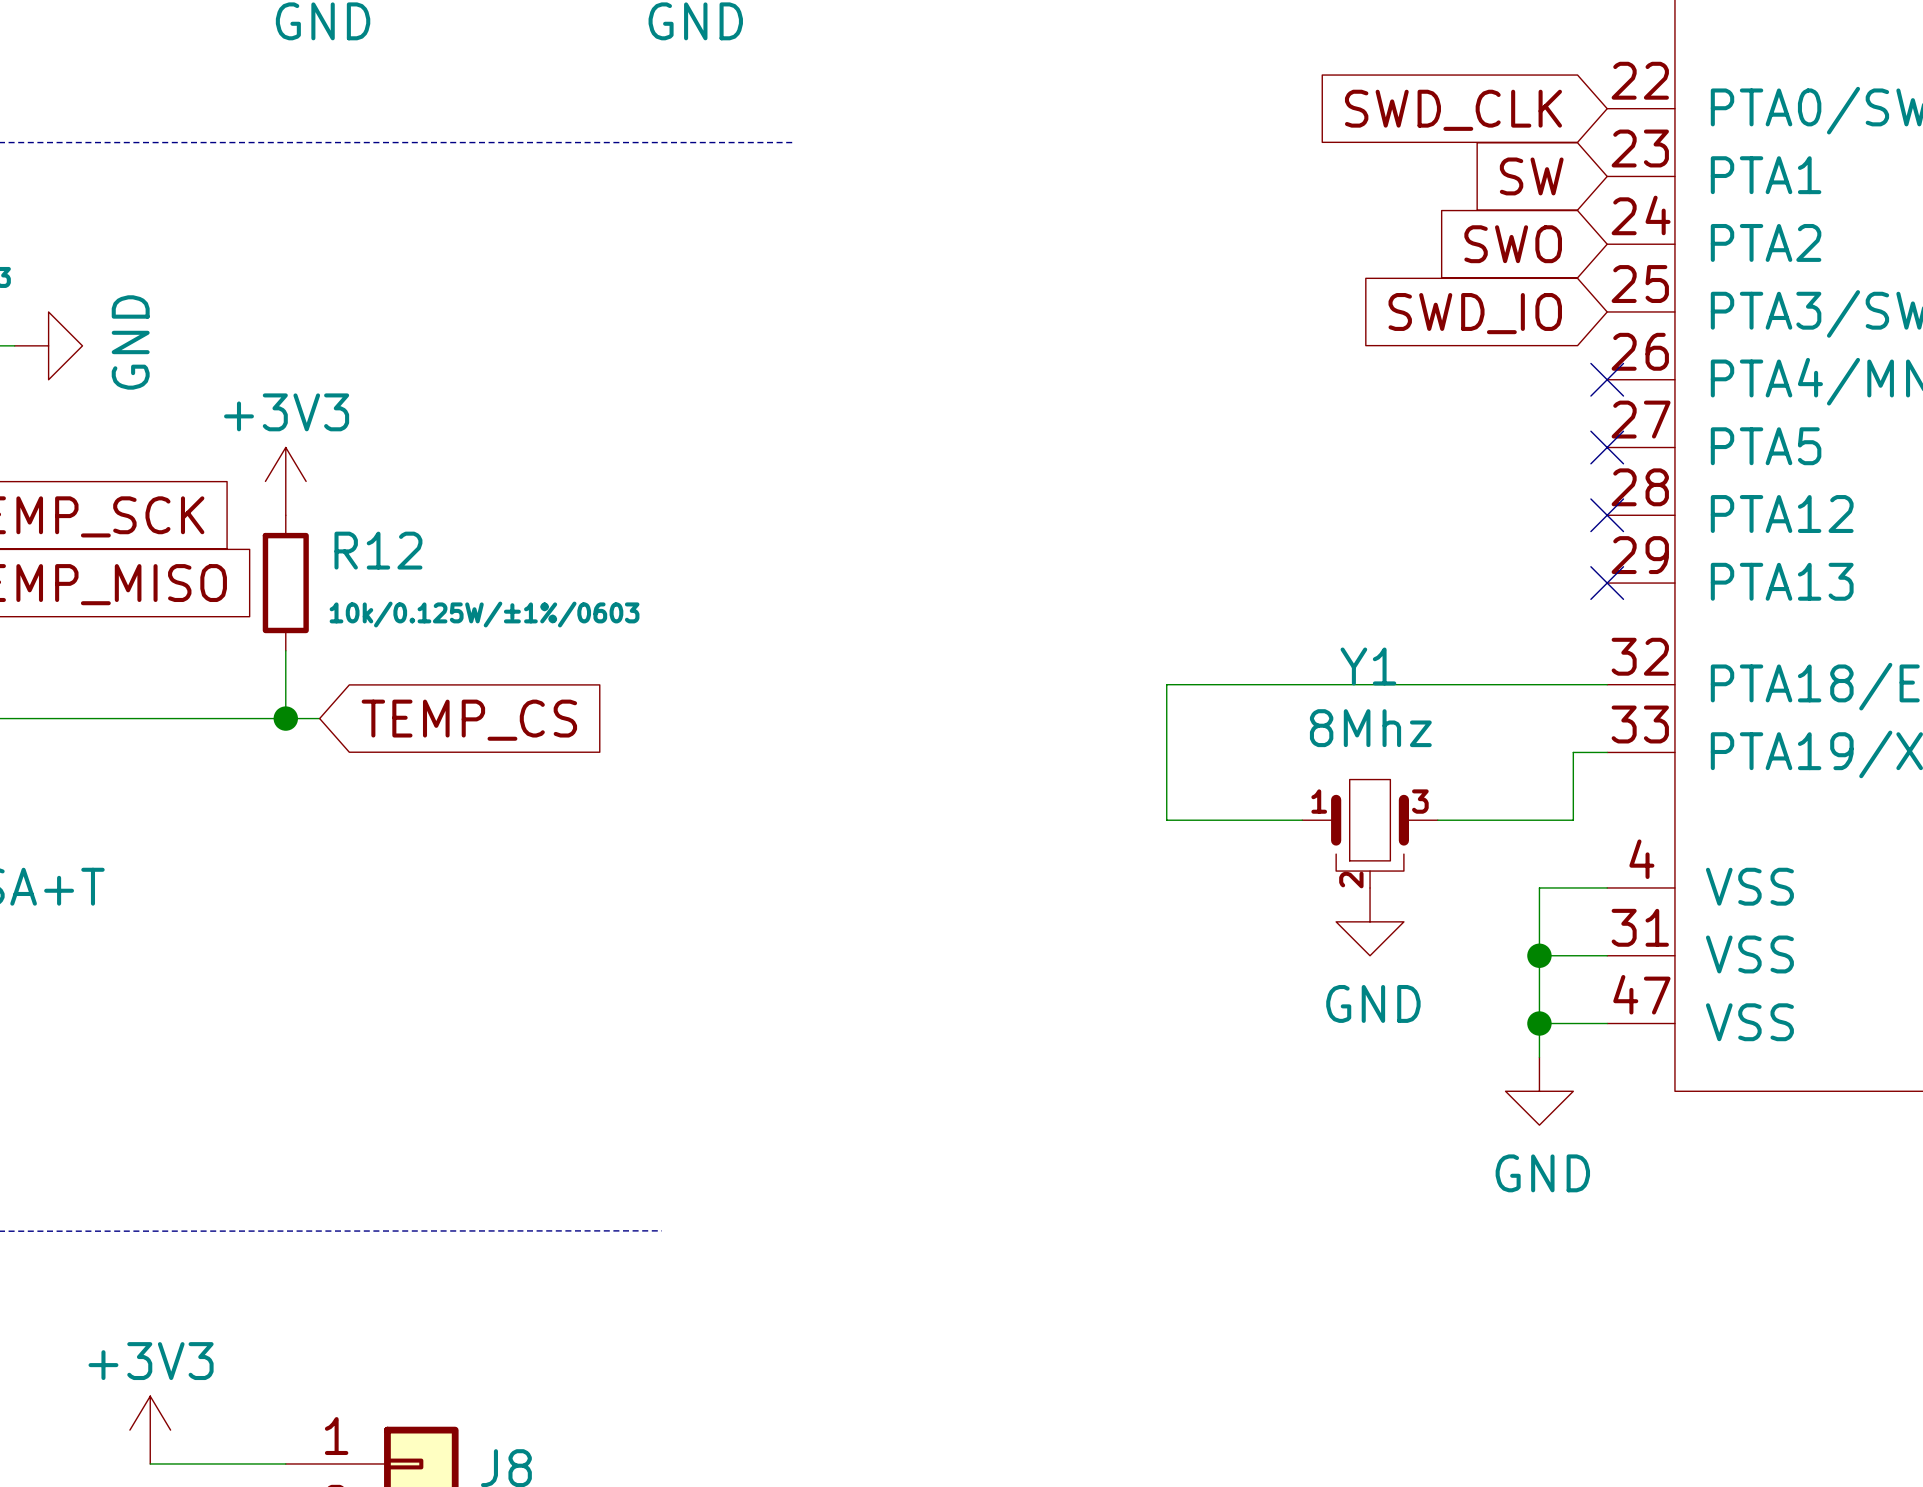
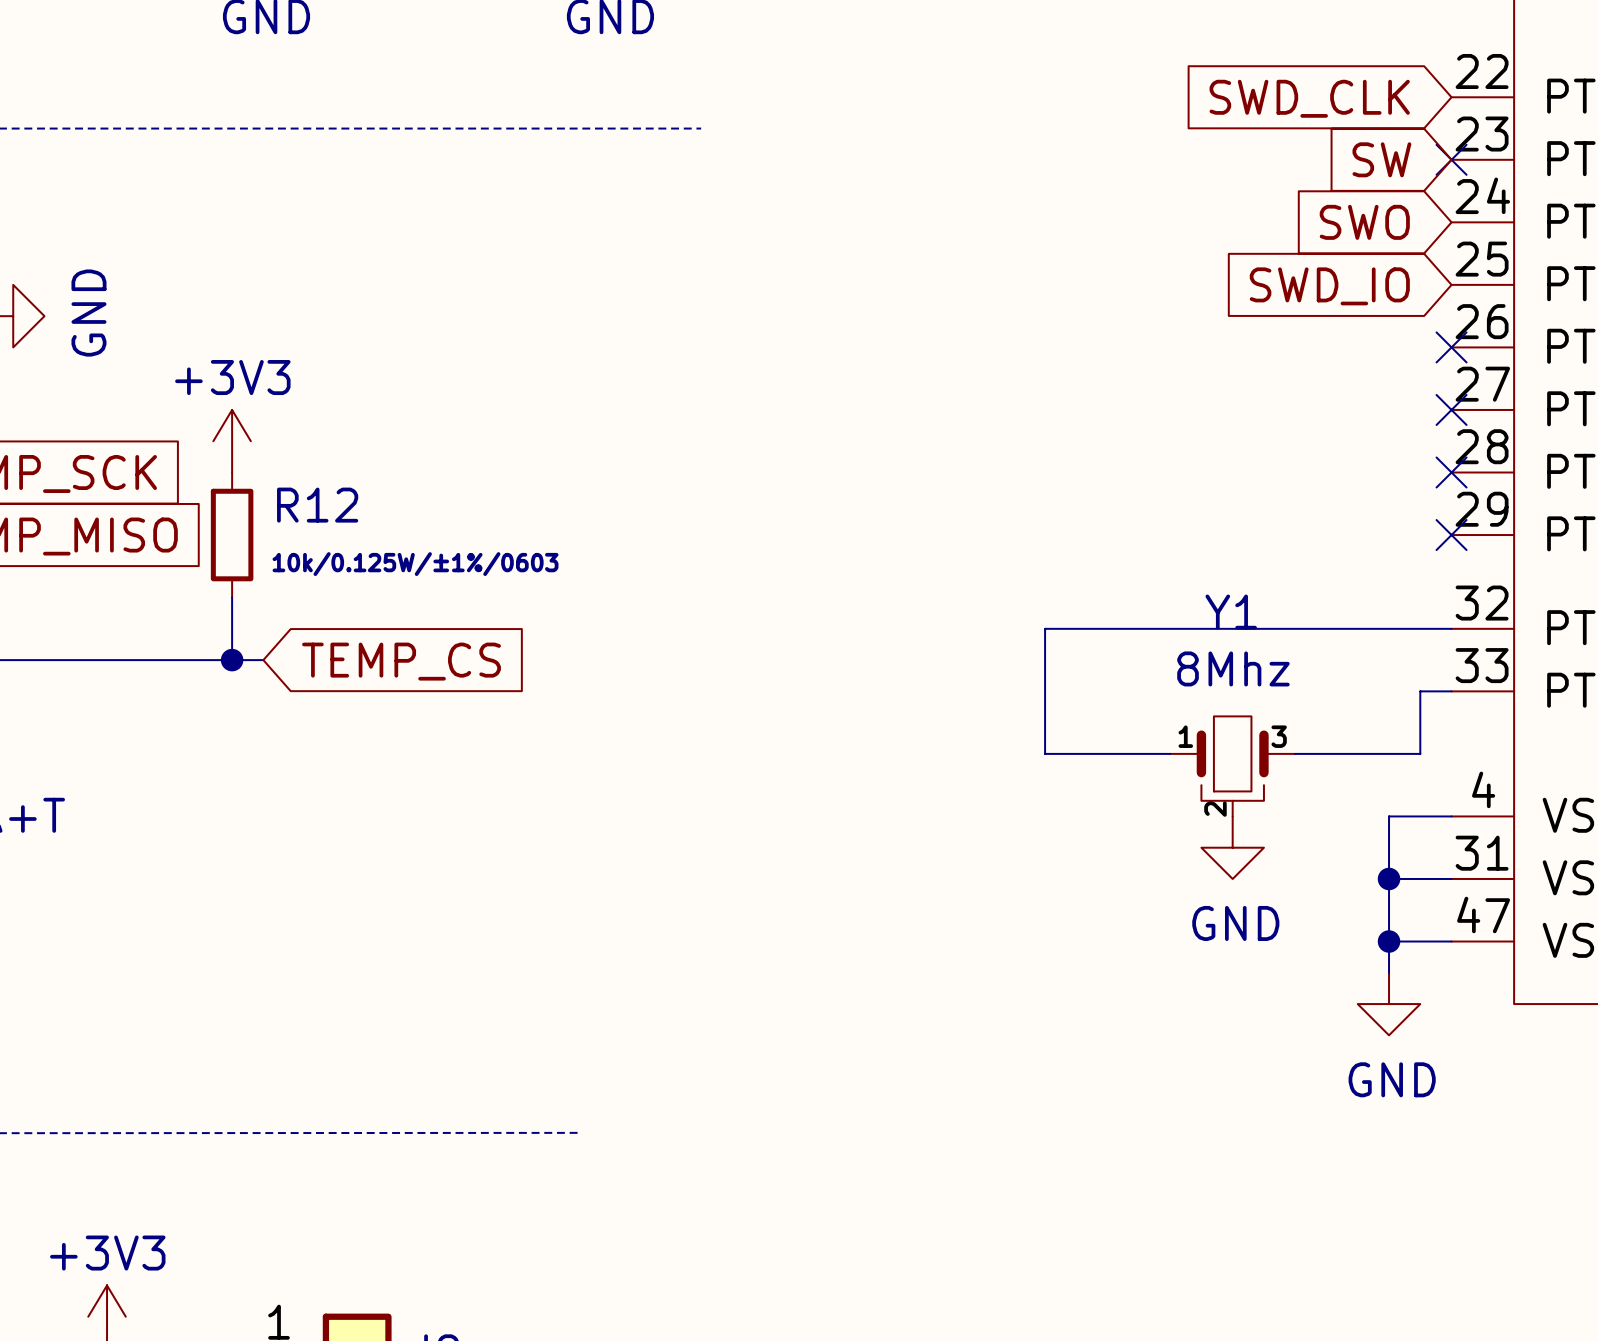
no-connect mark: none -> (1451, 159)

